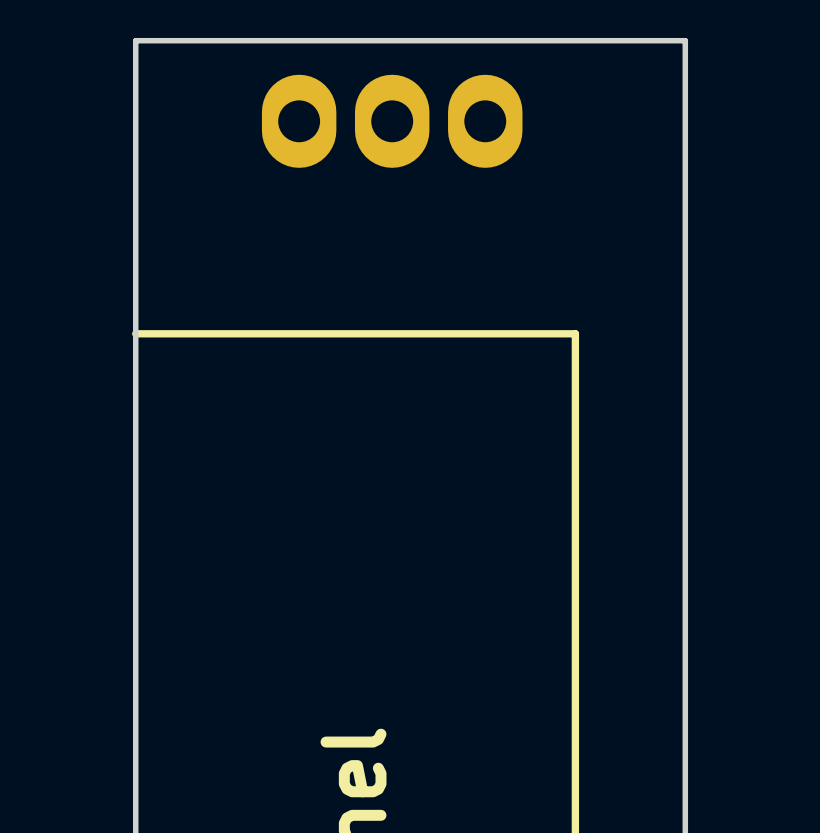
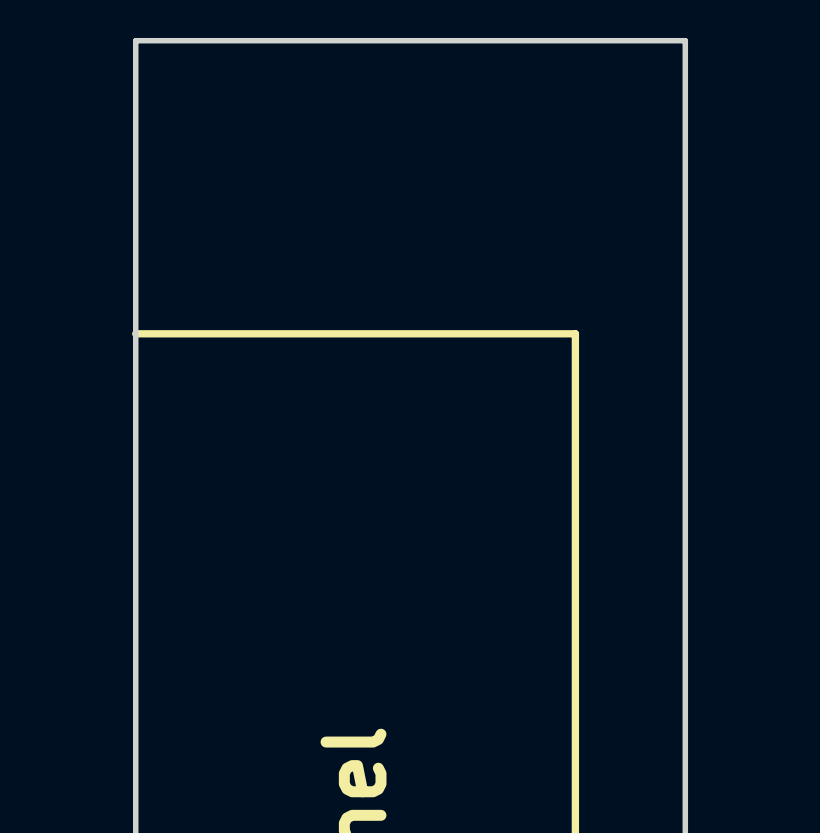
part: (392, 121) -> none

